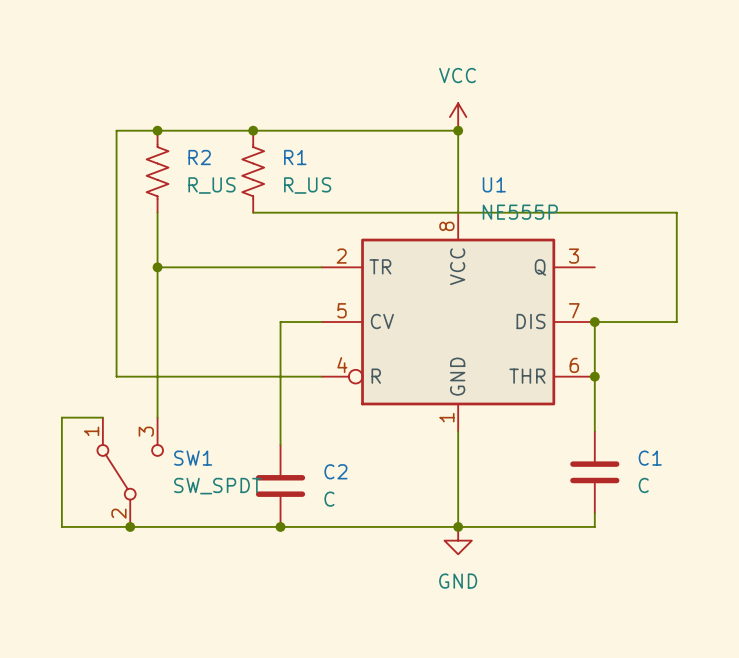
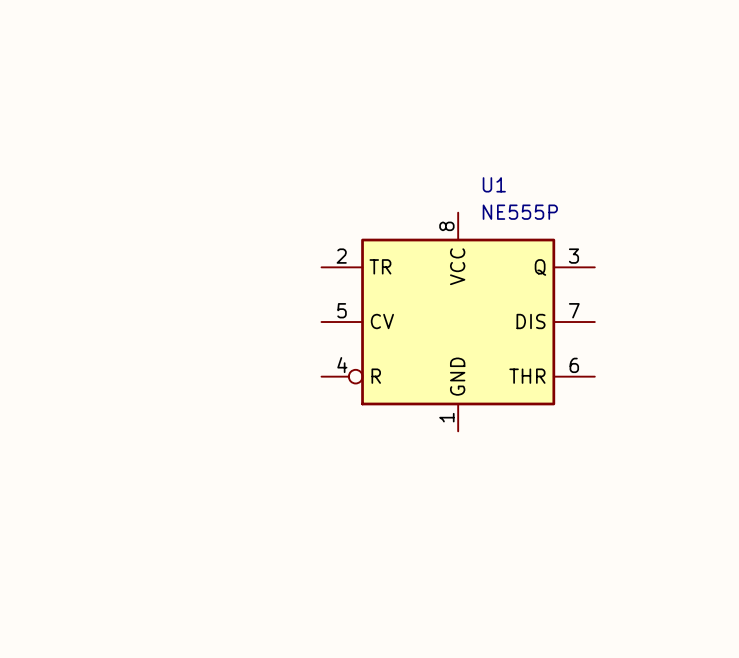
power symbol: VCC (458, 117) -> none
junction: (157, 130) -> none
junction: (253, 130) -> none
junction: (458, 130) -> none
R2: R_US (157, 171) -> none
R1: R_US (253, 171) -> none
wire: (157, 212) (157, 417) -> none
wire: (253, 212) (676, 212) (676, 322) (594, 322) (594, 431) -> none
wire: (458, 212) (458, 130) (116, 130) (116, 376) (321, 376) -> none
wire: (157, 267) (321, 267) -> none
junction: (157, 267) -> none
wire: (321, 322) (280, 322) (280, 444) -> none
junction: (594, 322) -> none
junction: (594, 376) -> none
wire: (102, 417) (61, 417) (61, 526) (594, 526) (594, 513) -> none
wire: (458, 431) (458, 526) -> none
SW1: SW_SPDT (130, 472) -> none
C1: C (594, 472) -> none
C2: C (280, 485) -> none
junction: (130, 526) -> none
junction: (280, 526) -> none
junction: (458, 526) -> none
power symbol: GND (458, 540) -> none

